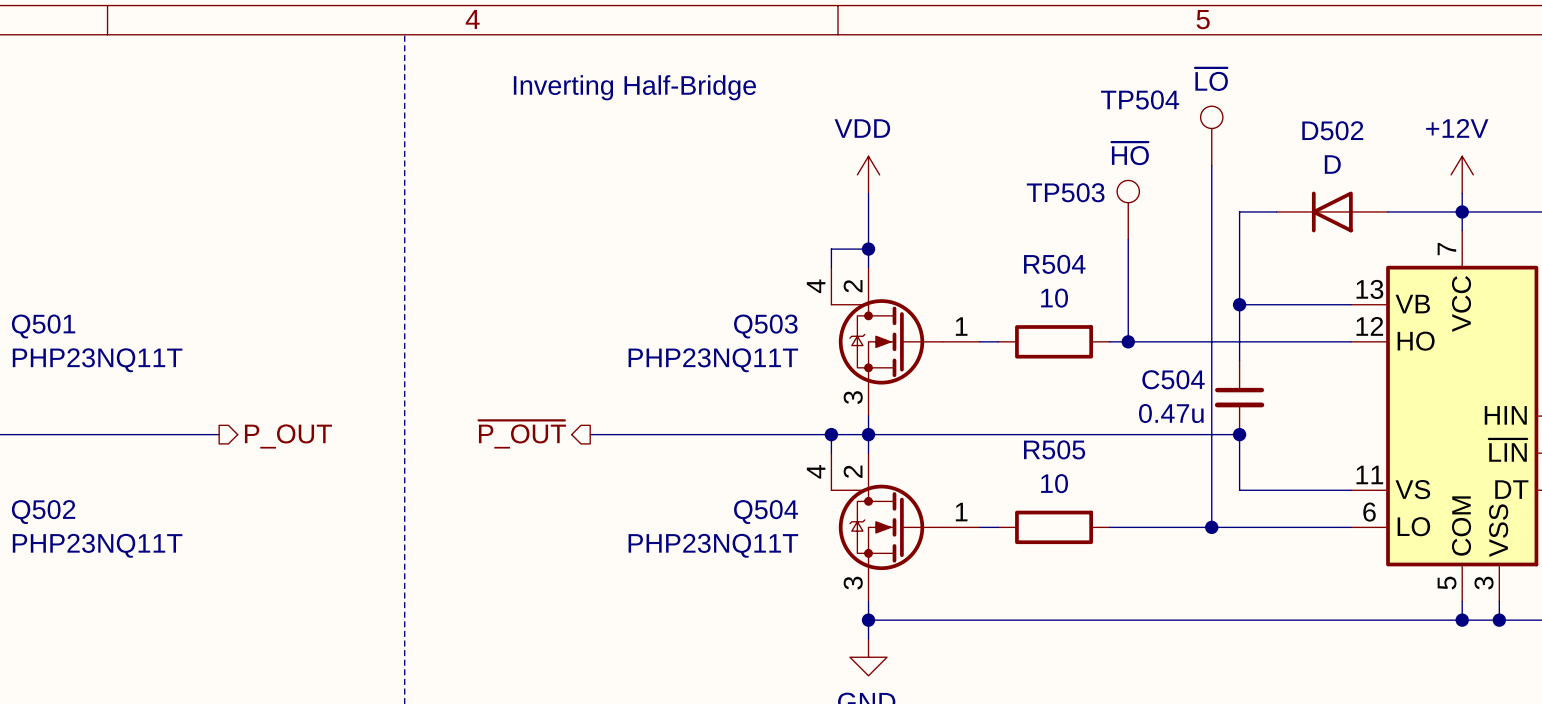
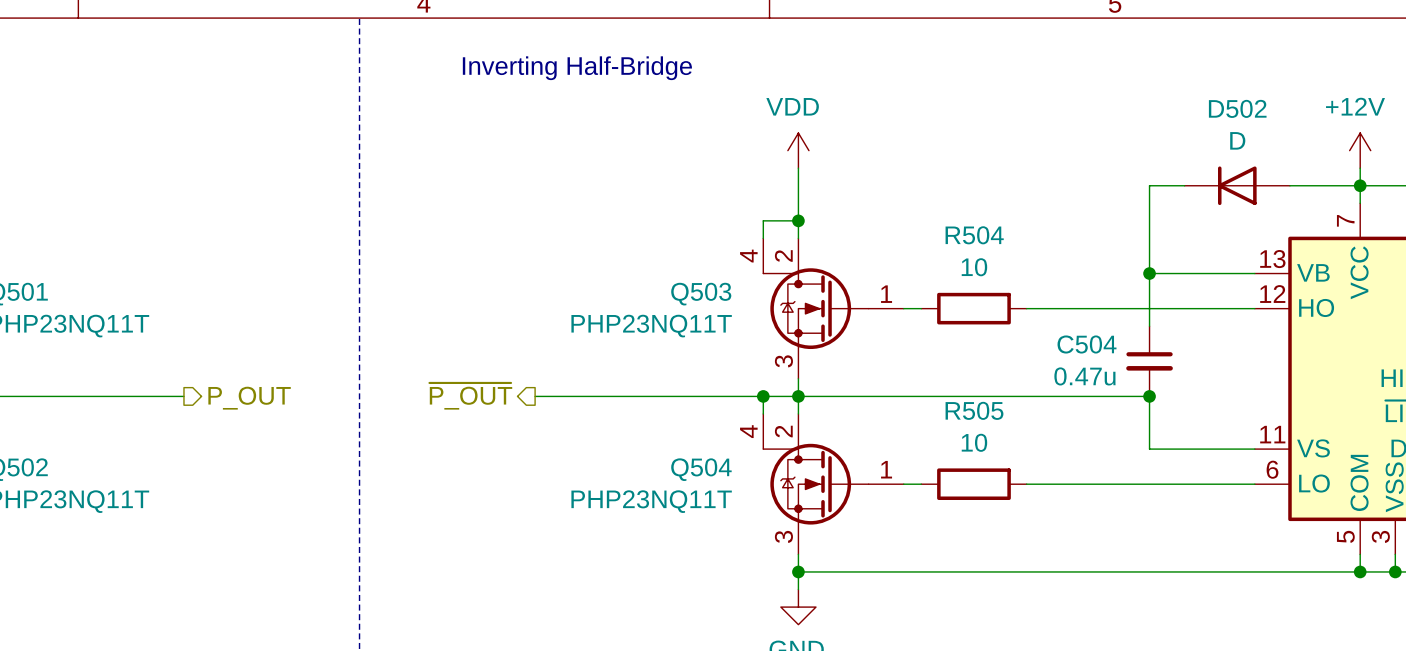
TP504: ~{LO} (1211, 135) -> none
wire: (1211, 165) (1211, 527) -> none
TP503: ~{HO} (1128, 210) -> none
wire: (1128, 239) (1128, 341) -> none
junction: (1128, 341) -> none
junction: (1211, 527) -> none

